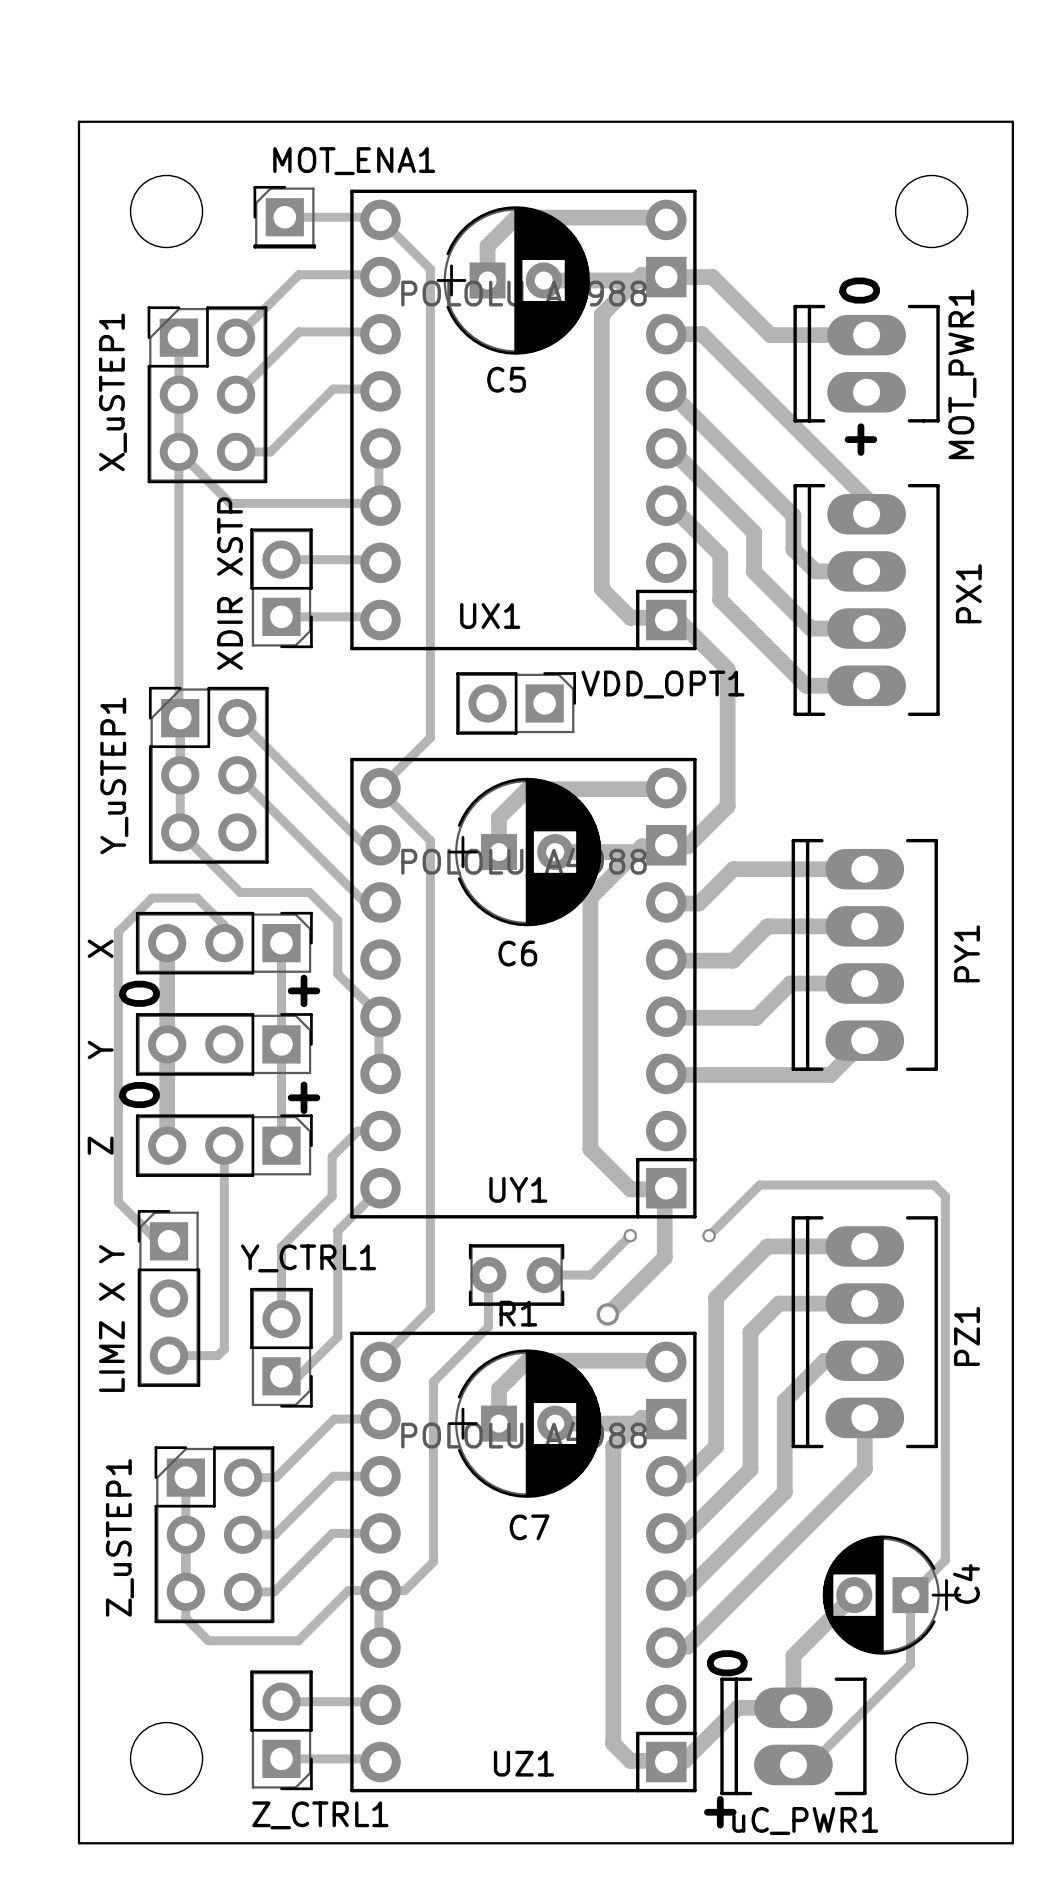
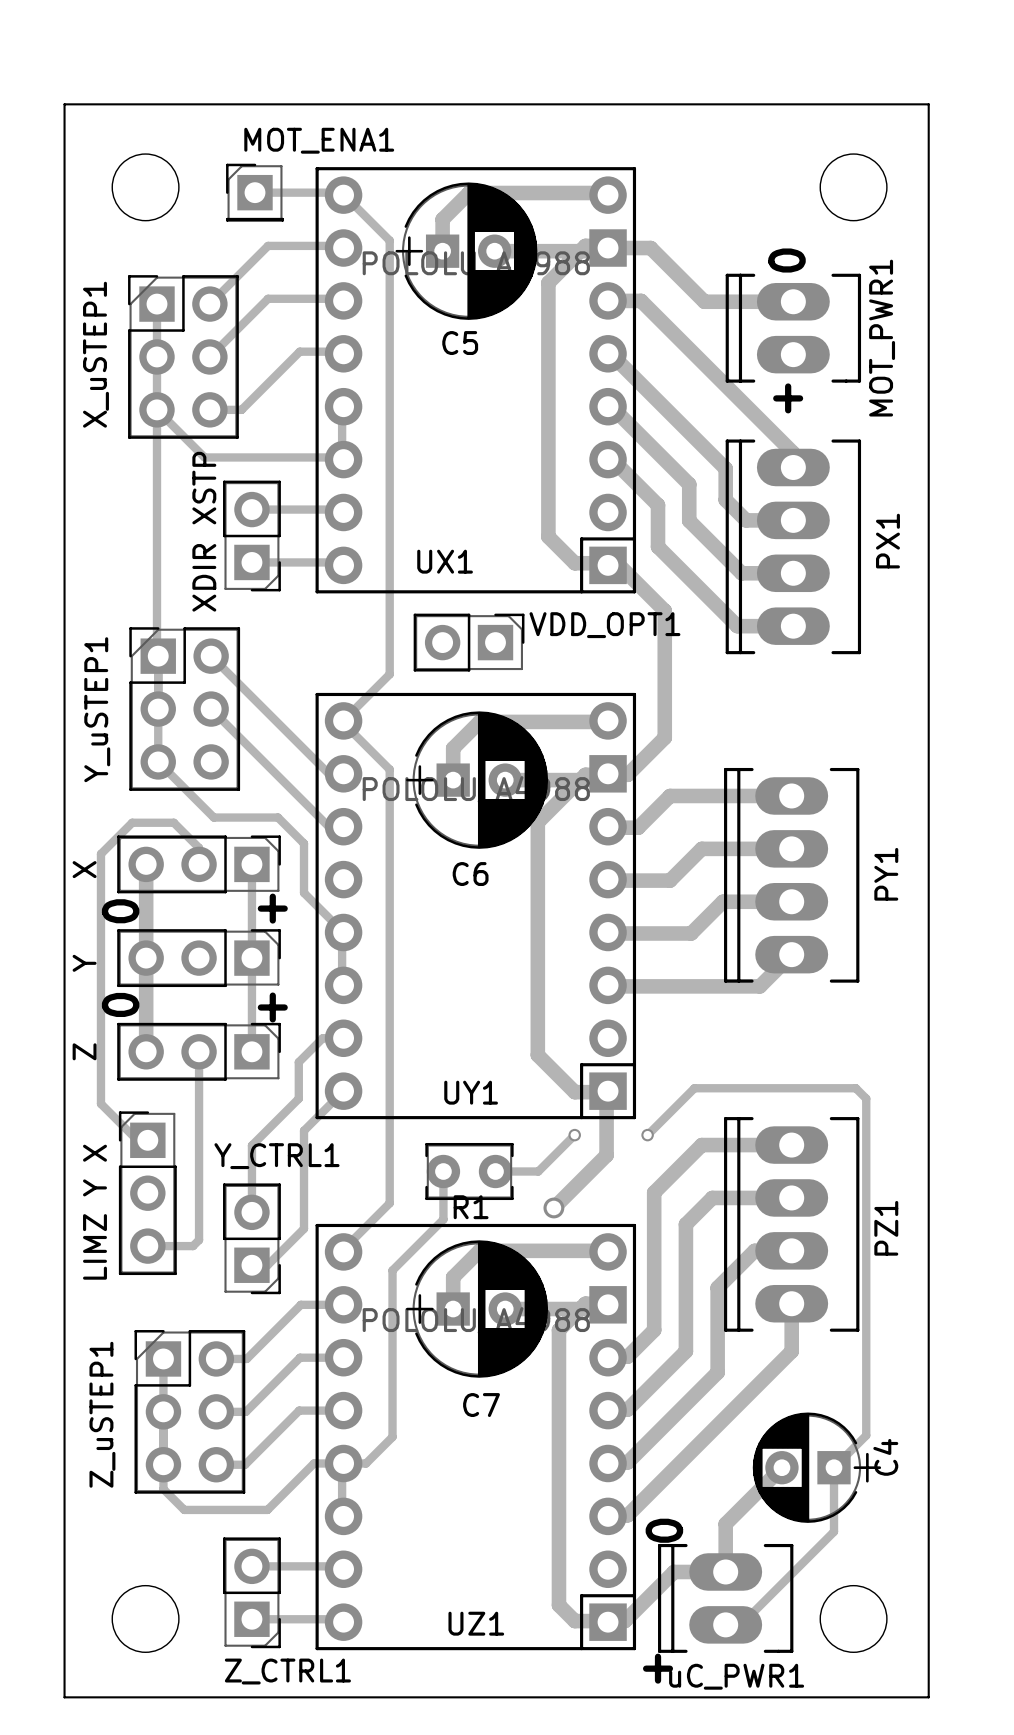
LIMZ X Y name: LIMZ X Y (111, 1318) -> LIMZ Y X (95, 1212)

